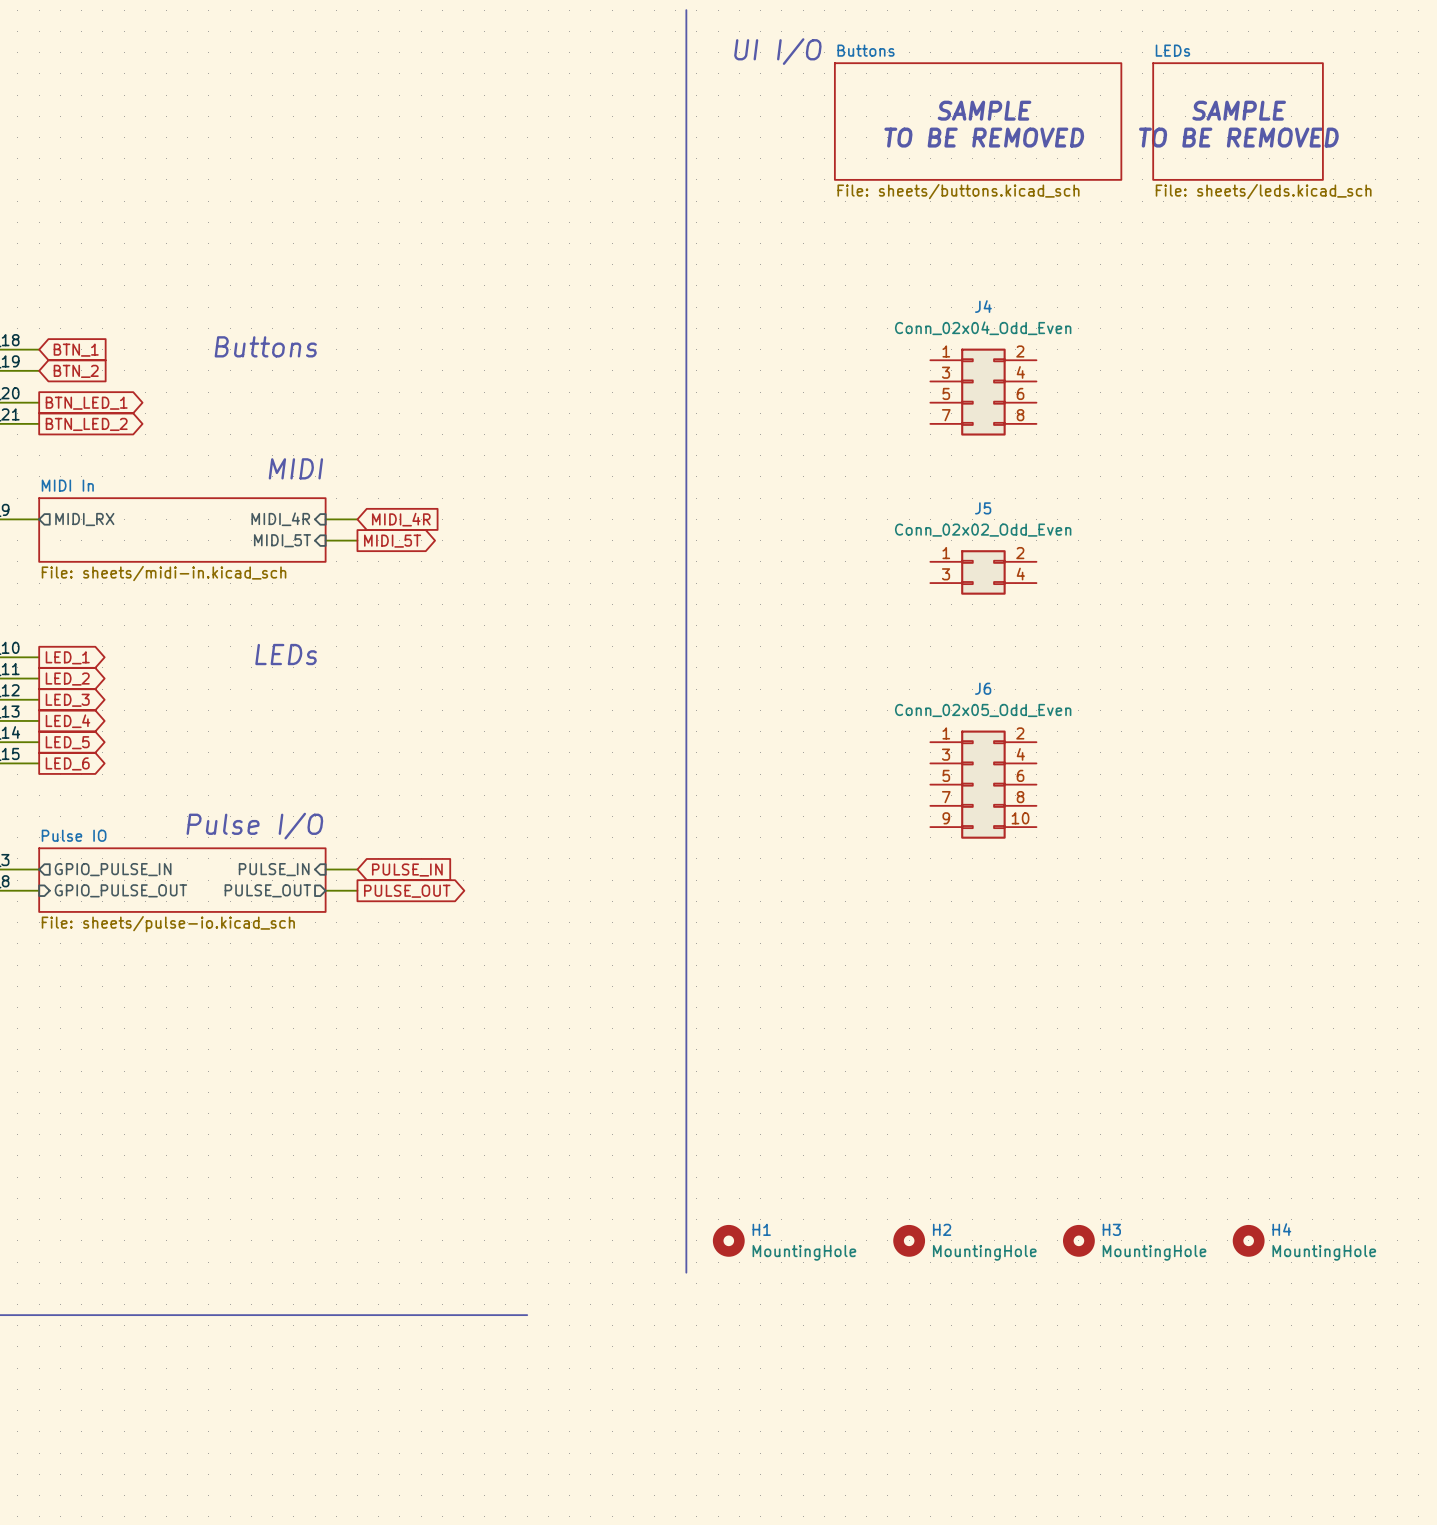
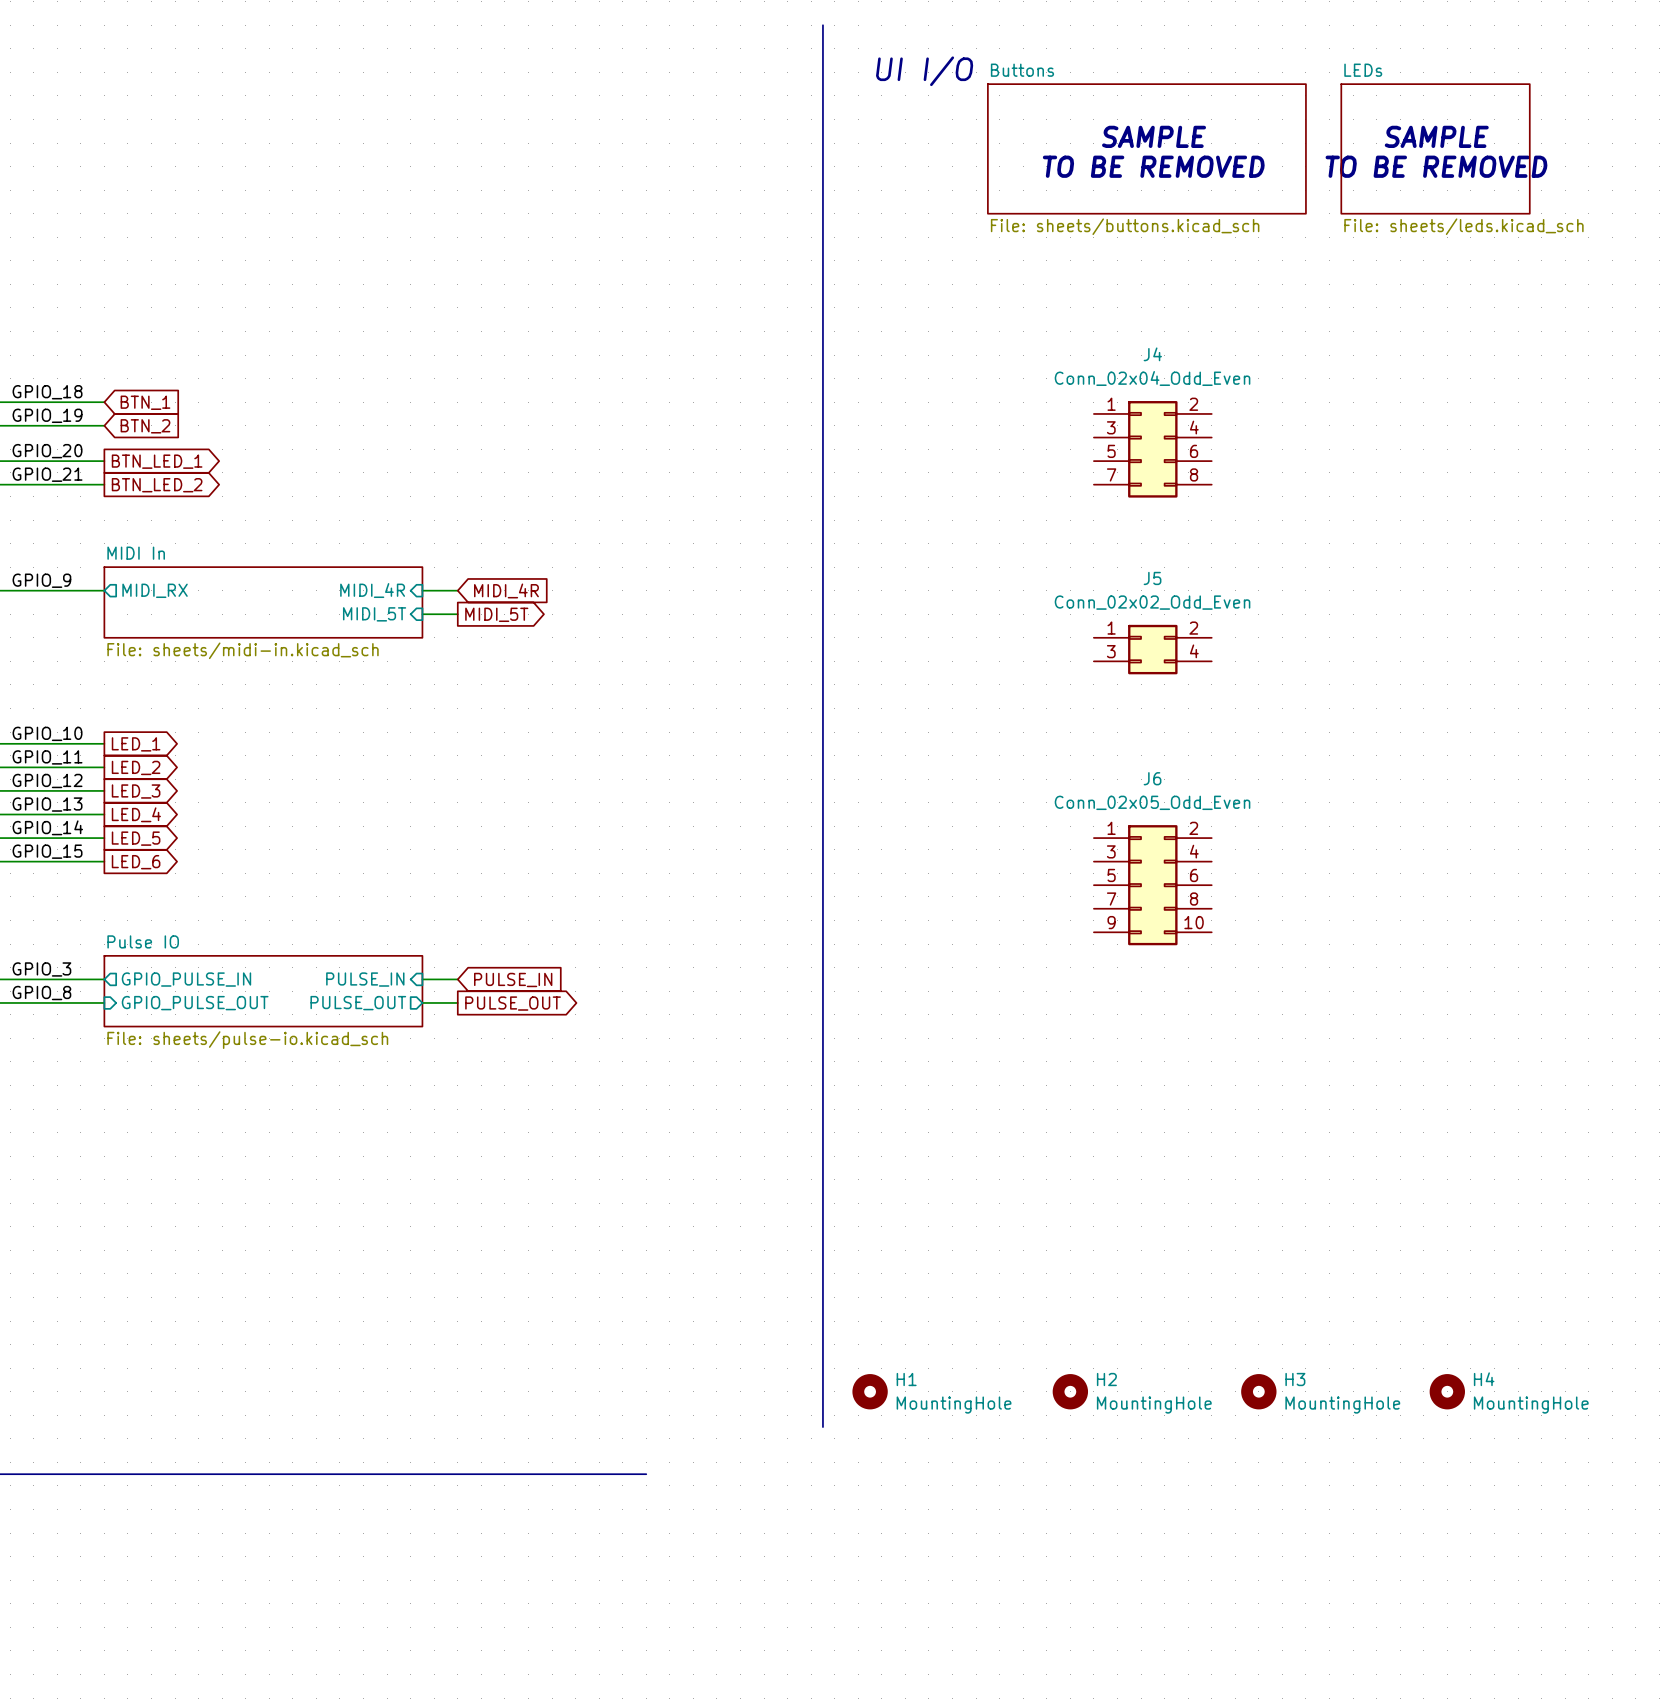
text: Buttons (265, 346) -> none
text: MIDI (295, 468) -> none
text: LEDs (286, 654) -> none
text: Pulse I/O (254, 826) -> none

